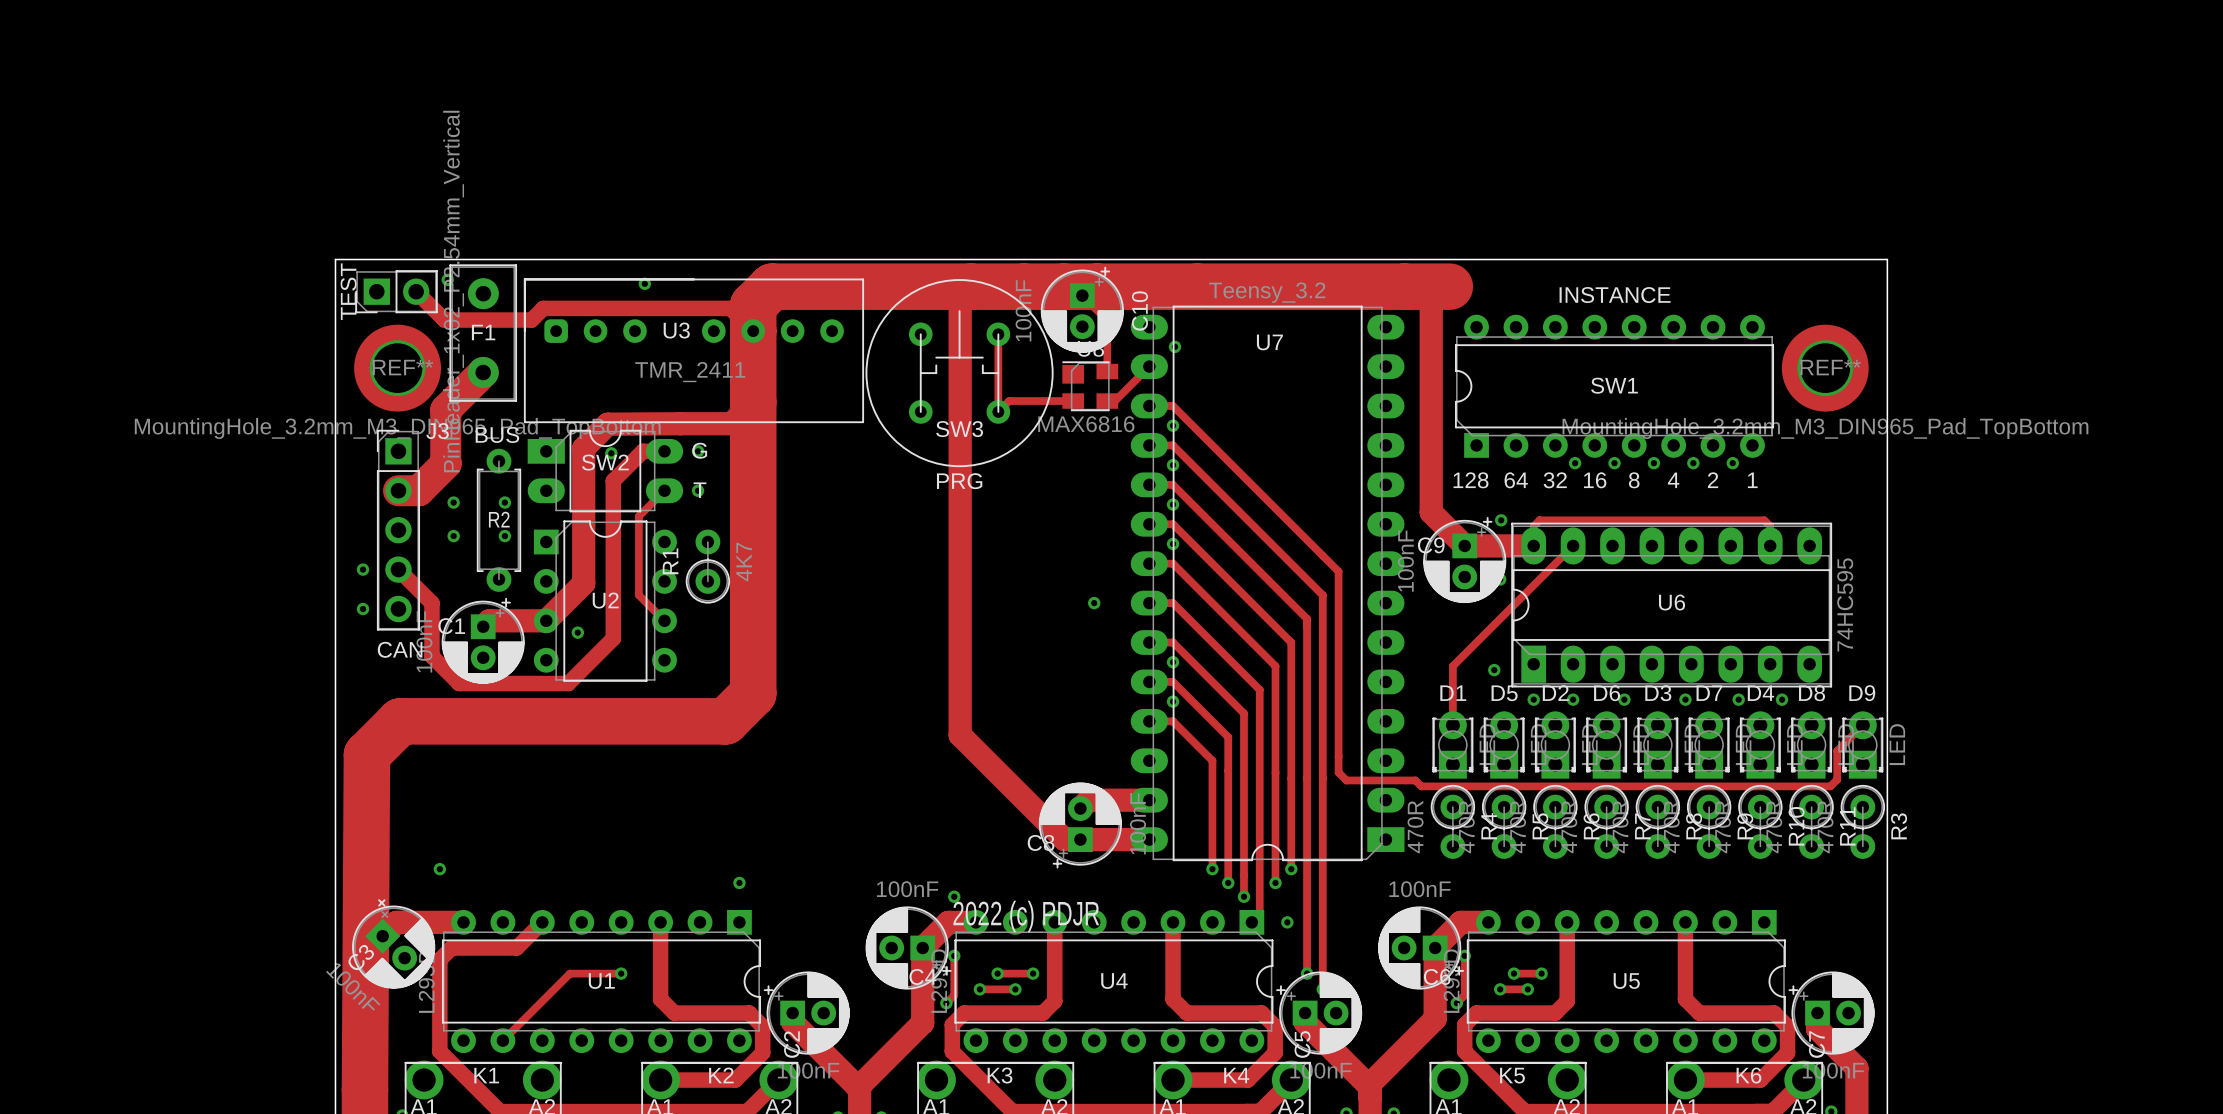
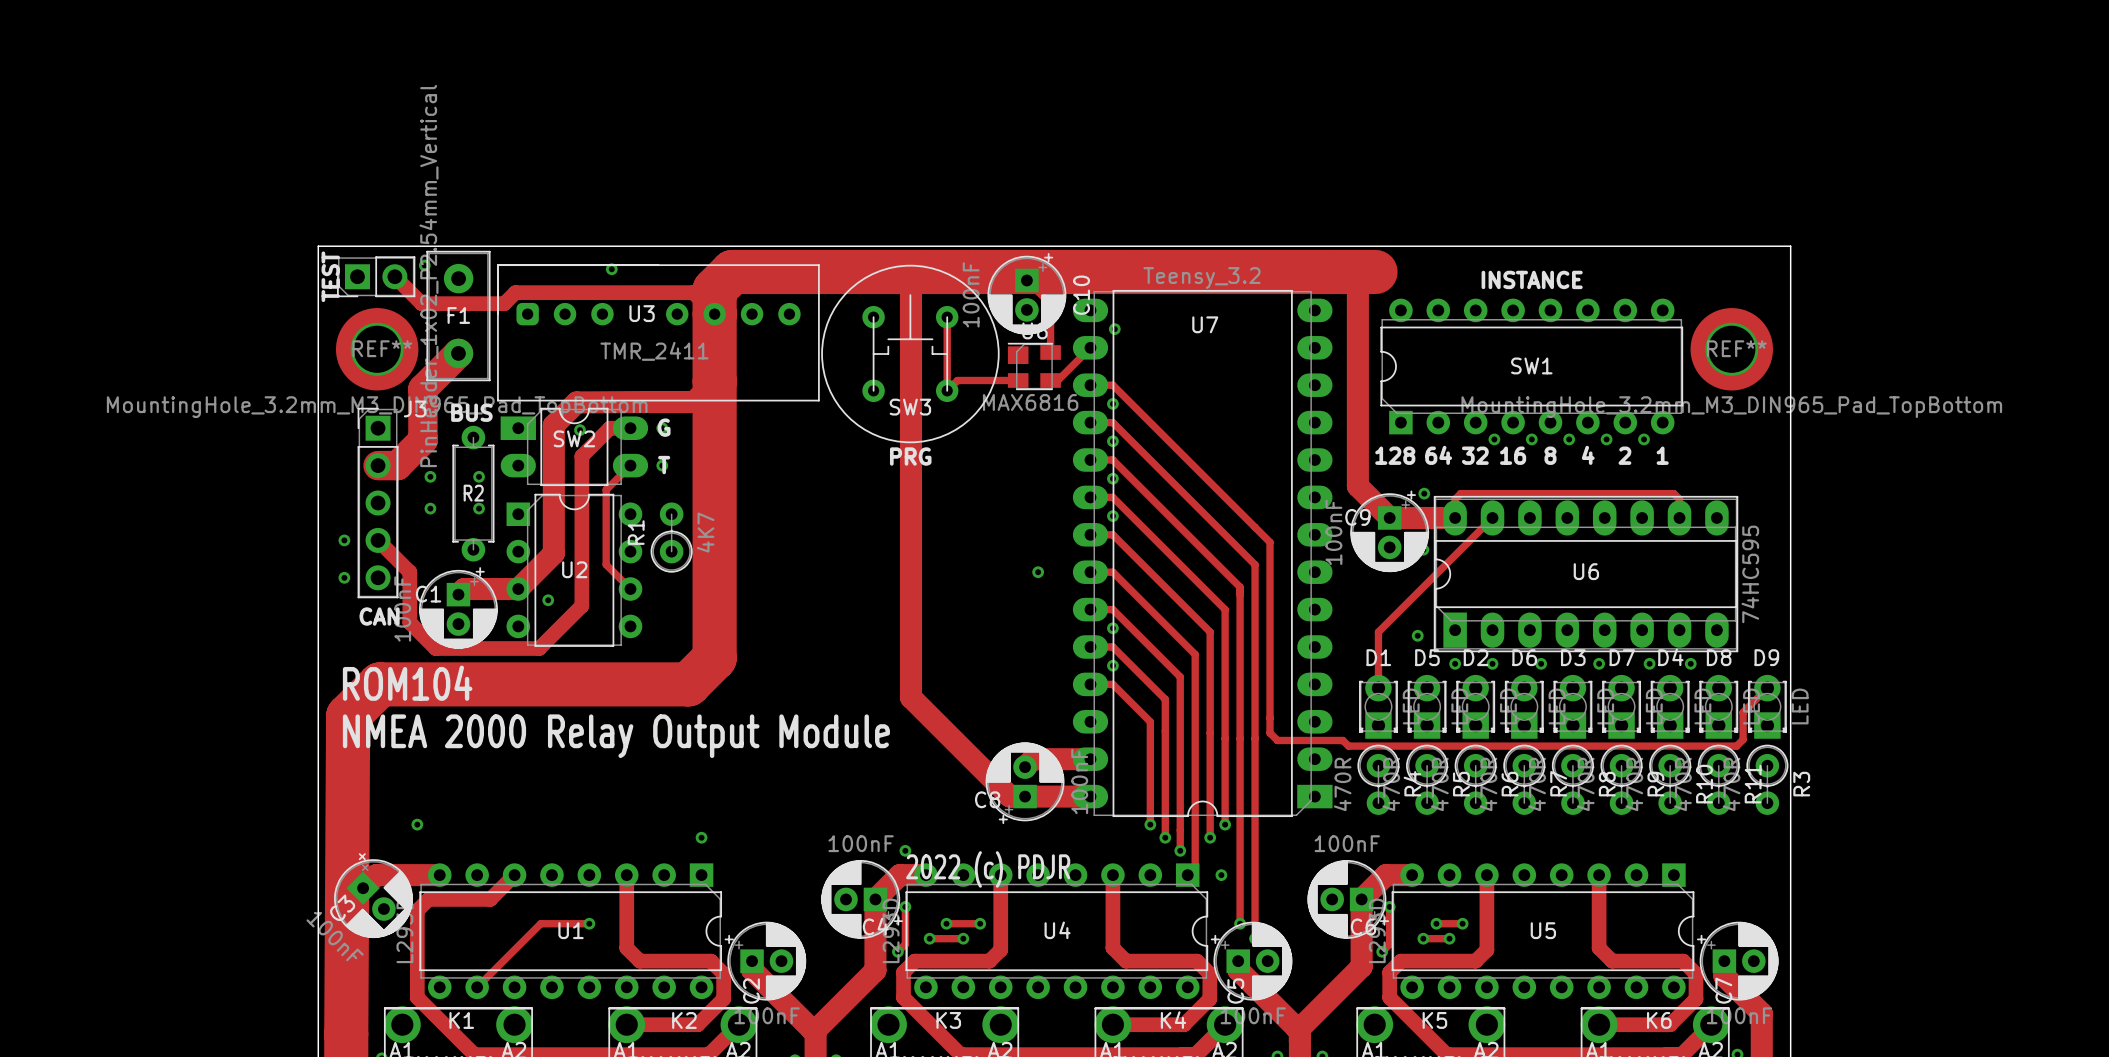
text: none -> ROM104 (407, 683)
text: none -> NMEA 2000 Relay Output Module (616, 736)

